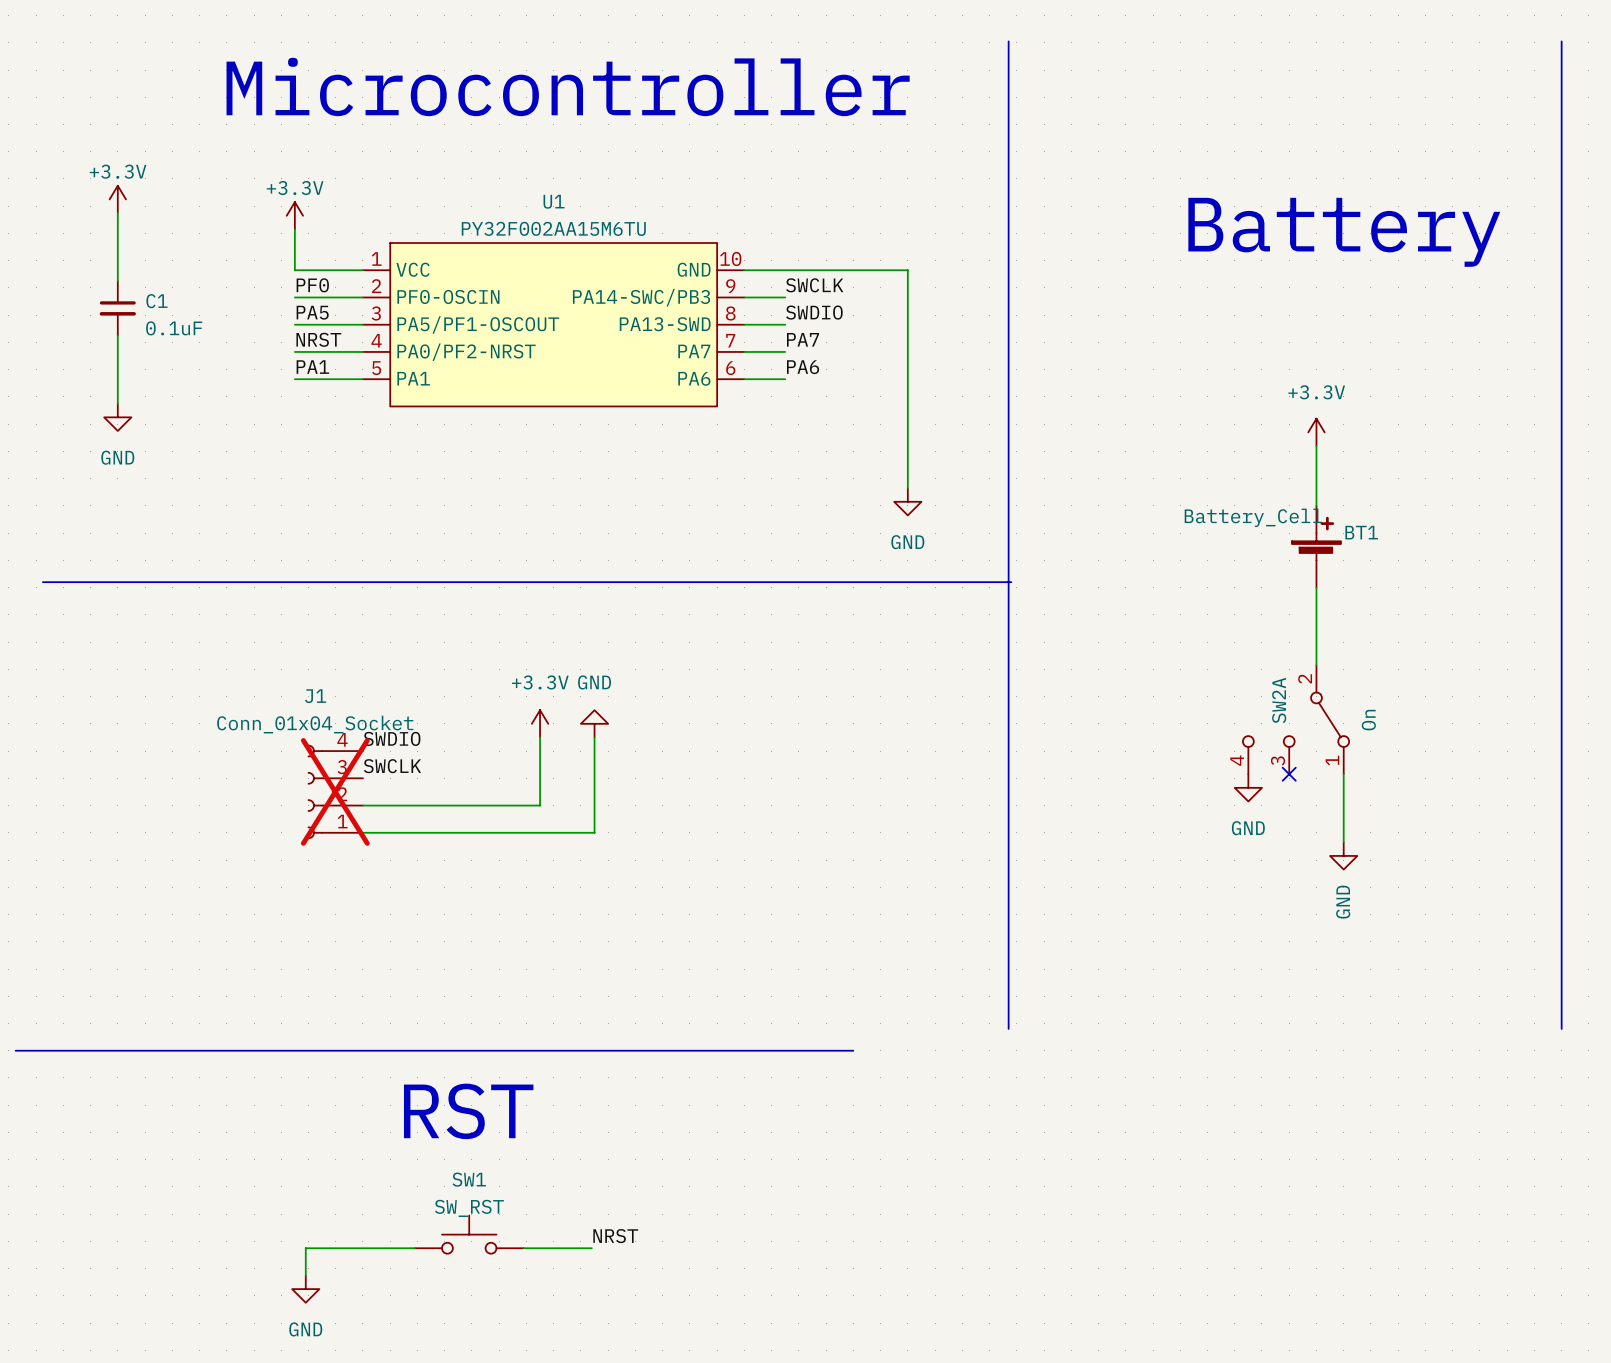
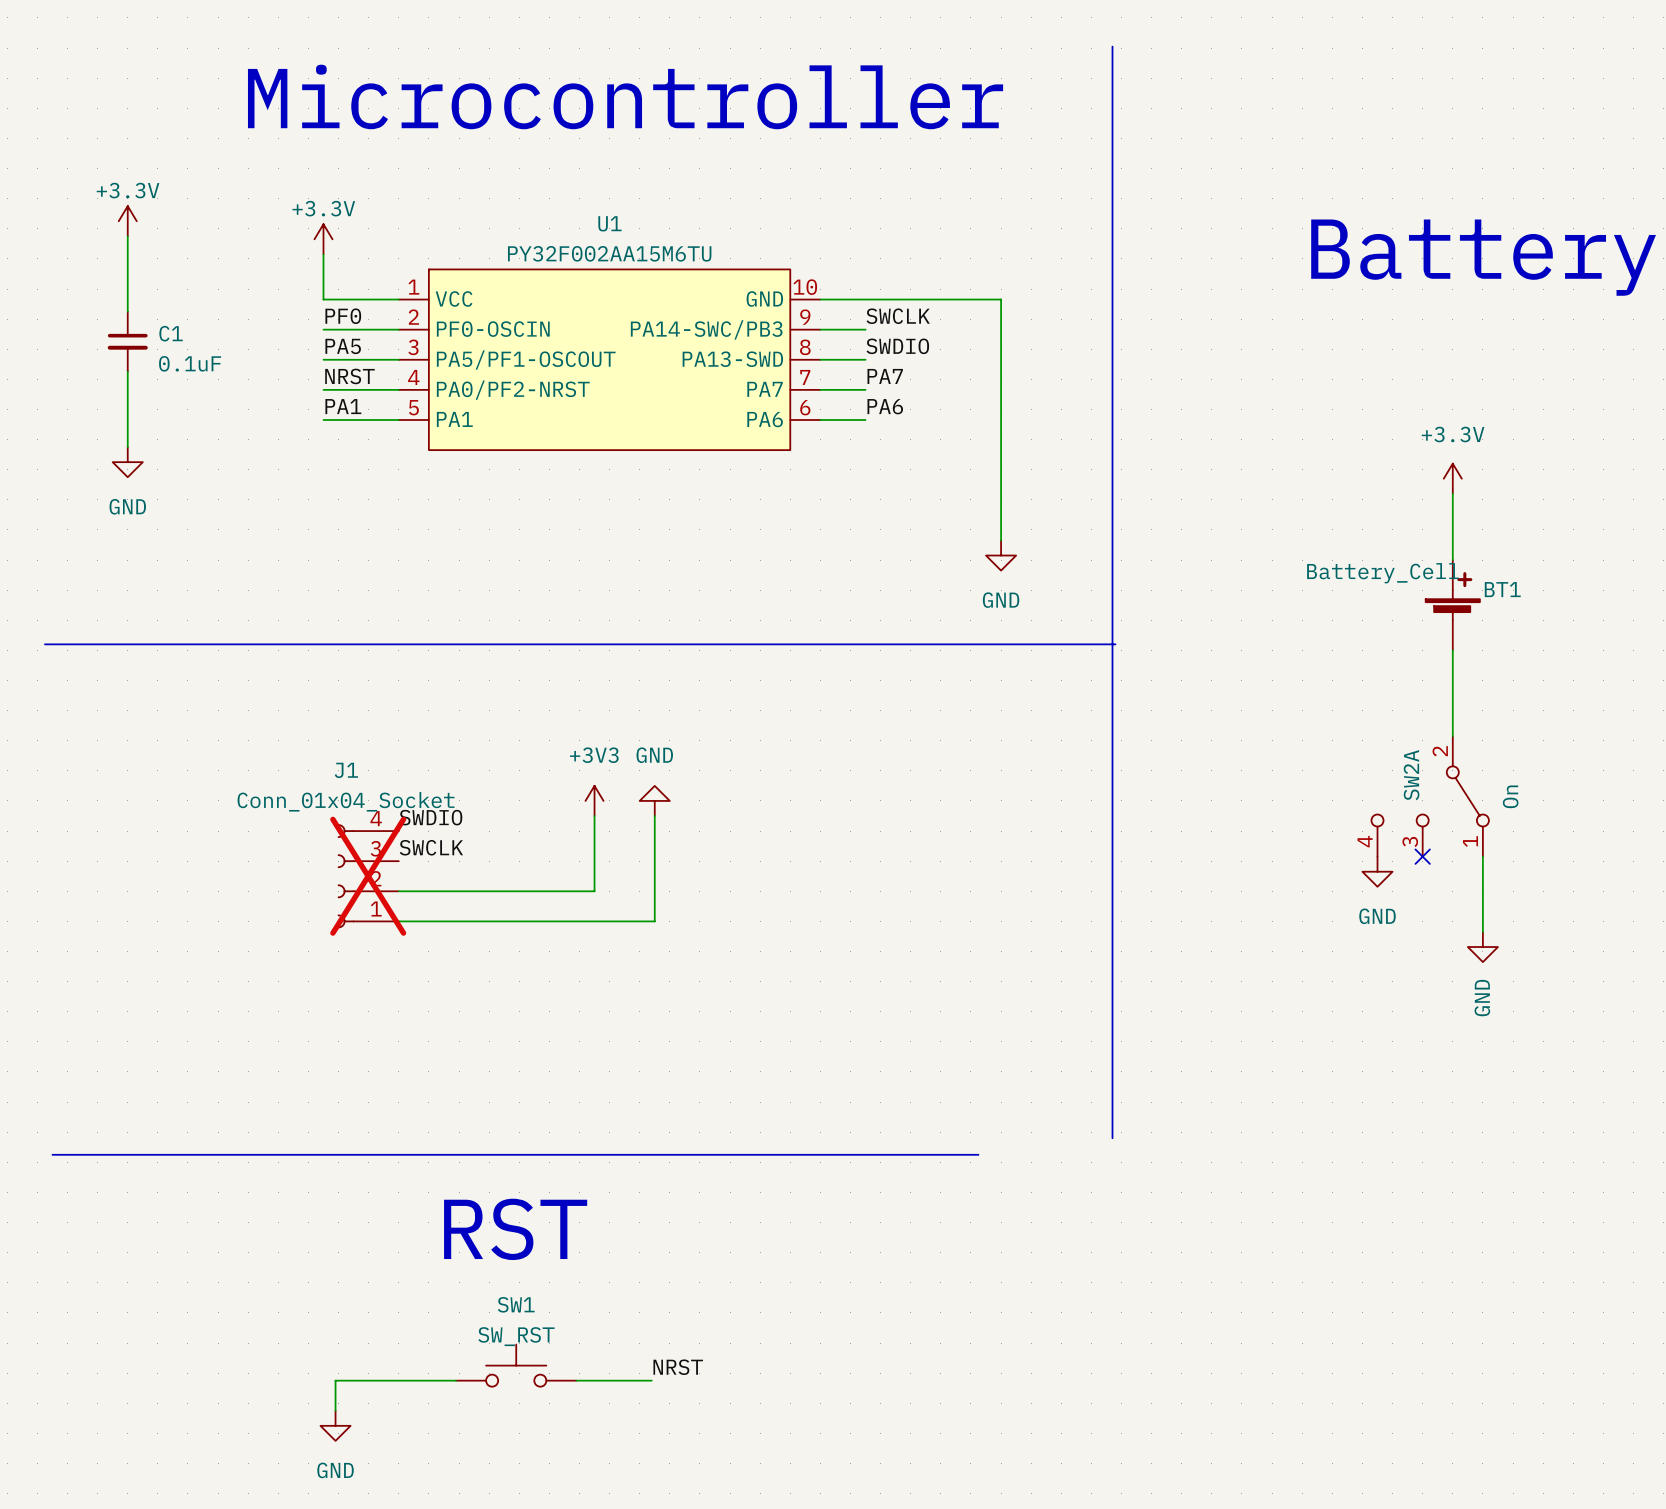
power symbol: +3.3V (540, 723) -> +3V3 (594, 800)
line: (15, 1050) (853, 1050) -> (52, 1154) (978, 1154)

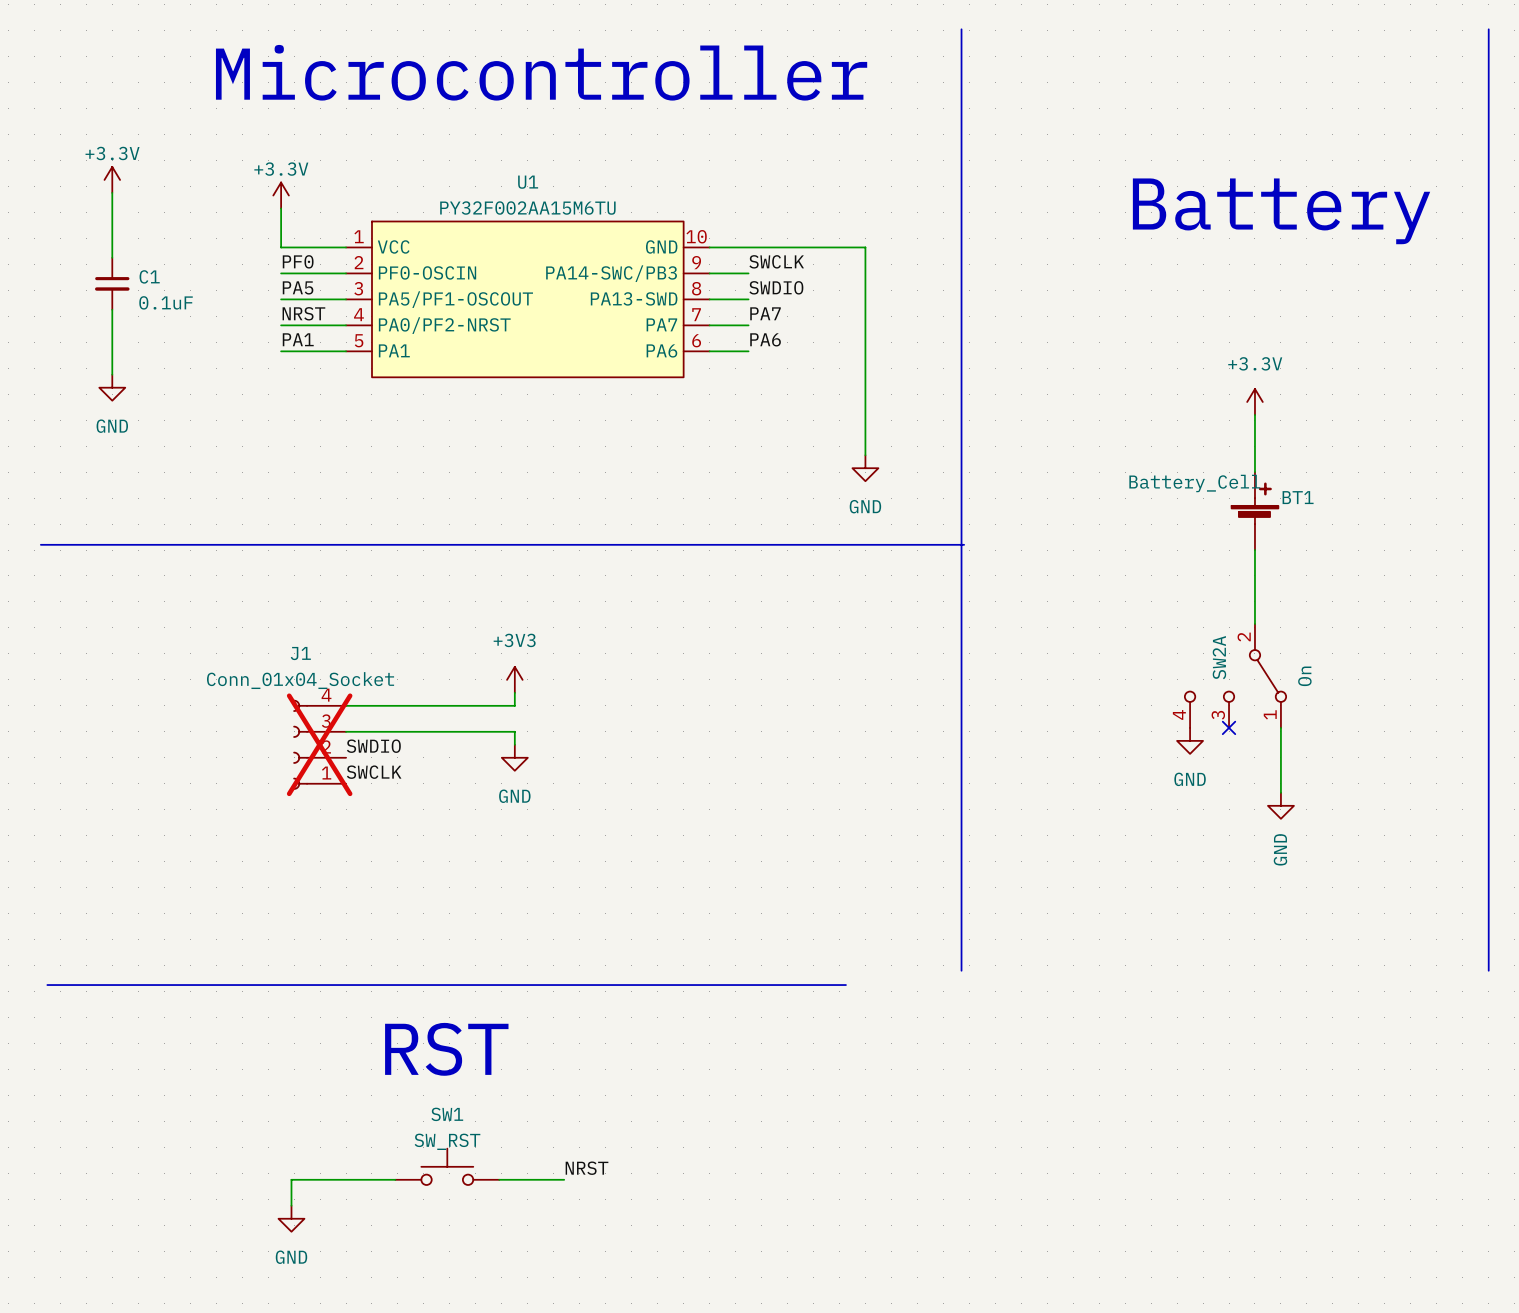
power symbol rotation: 0° (654, 800) -> 180° (514, 757)
power symbol position: GND (654, 800) -> GND (514, 757)
wire: (654, 816) (654, 921) (398, 921) -> none
label position: SWDIO (431, 817) -> SWDIO (373, 746)
wire: (594, 831) (594, 861) -> (514, 705) (346, 705)
label position: SWCLK (431, 847) -> SWCLK (374, 772)
wire: none -> (346, 731) (514, 731)
wire: (594, 876) (594, 891) (398, 891) -> none

